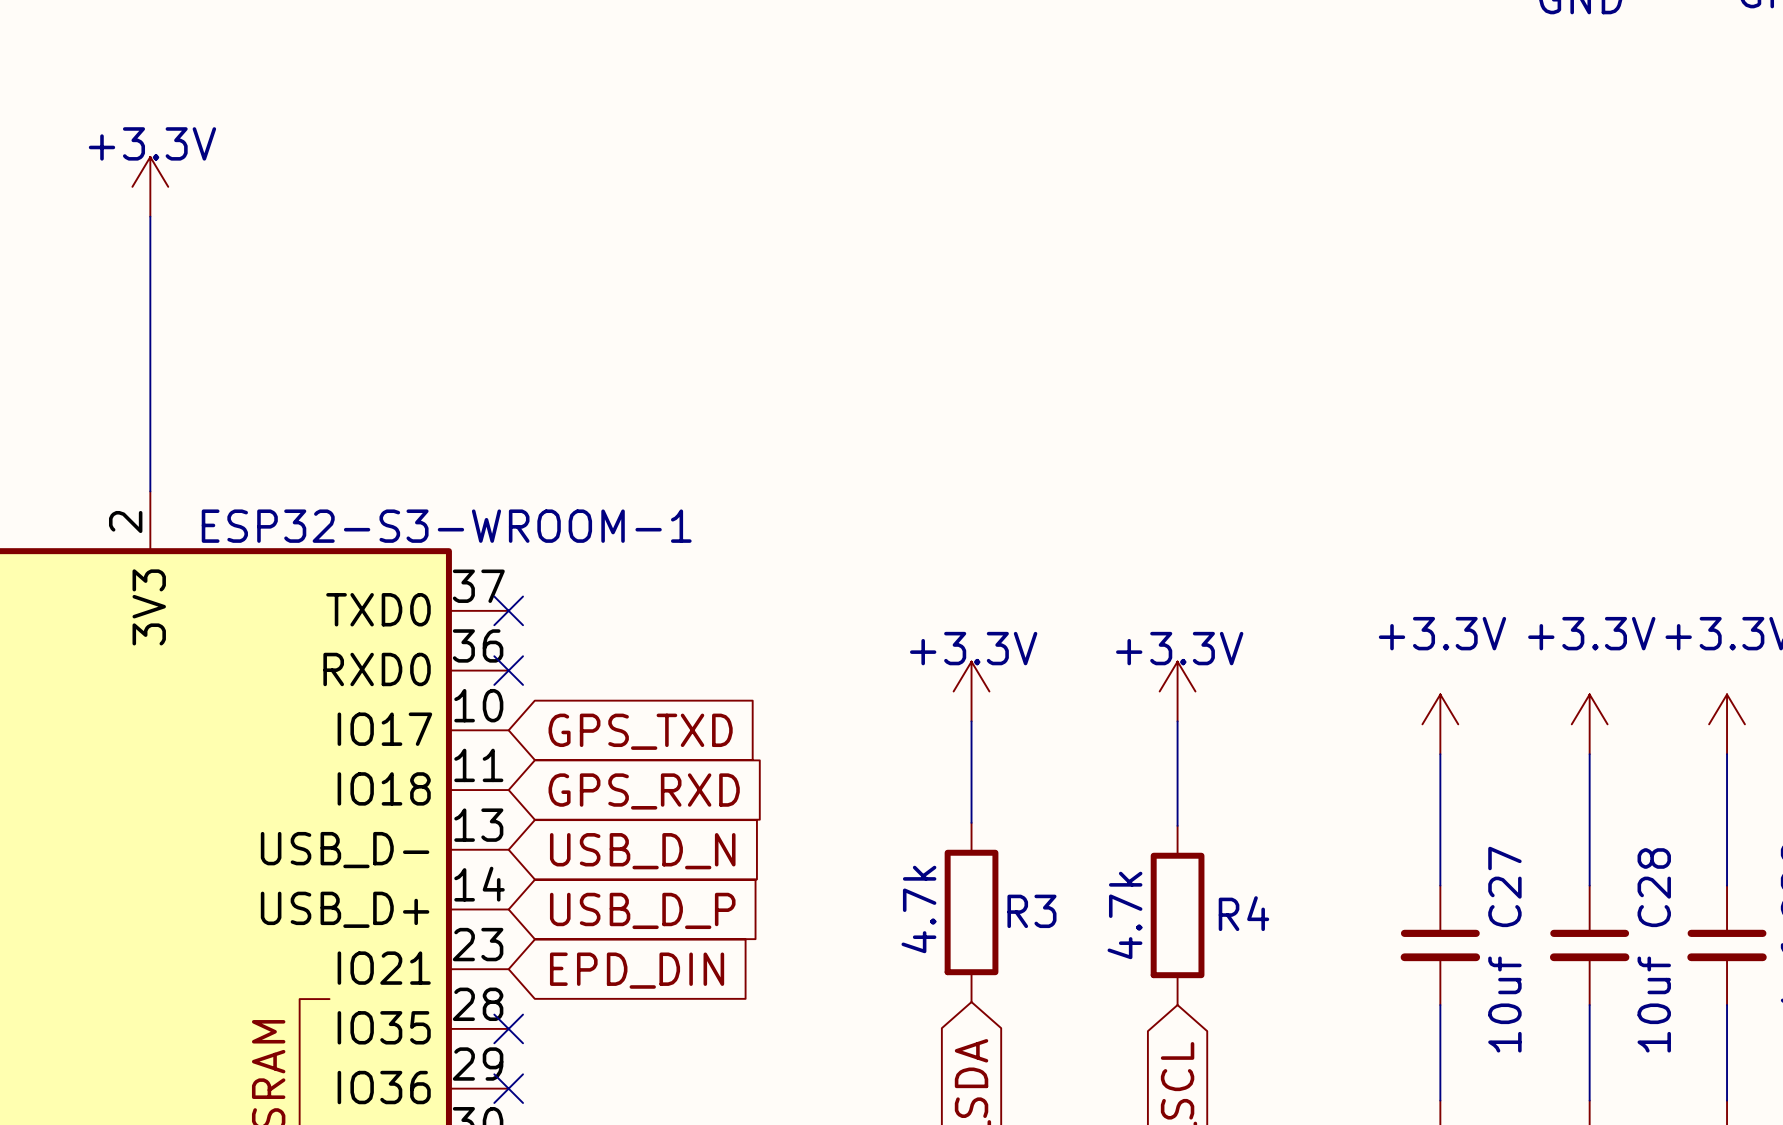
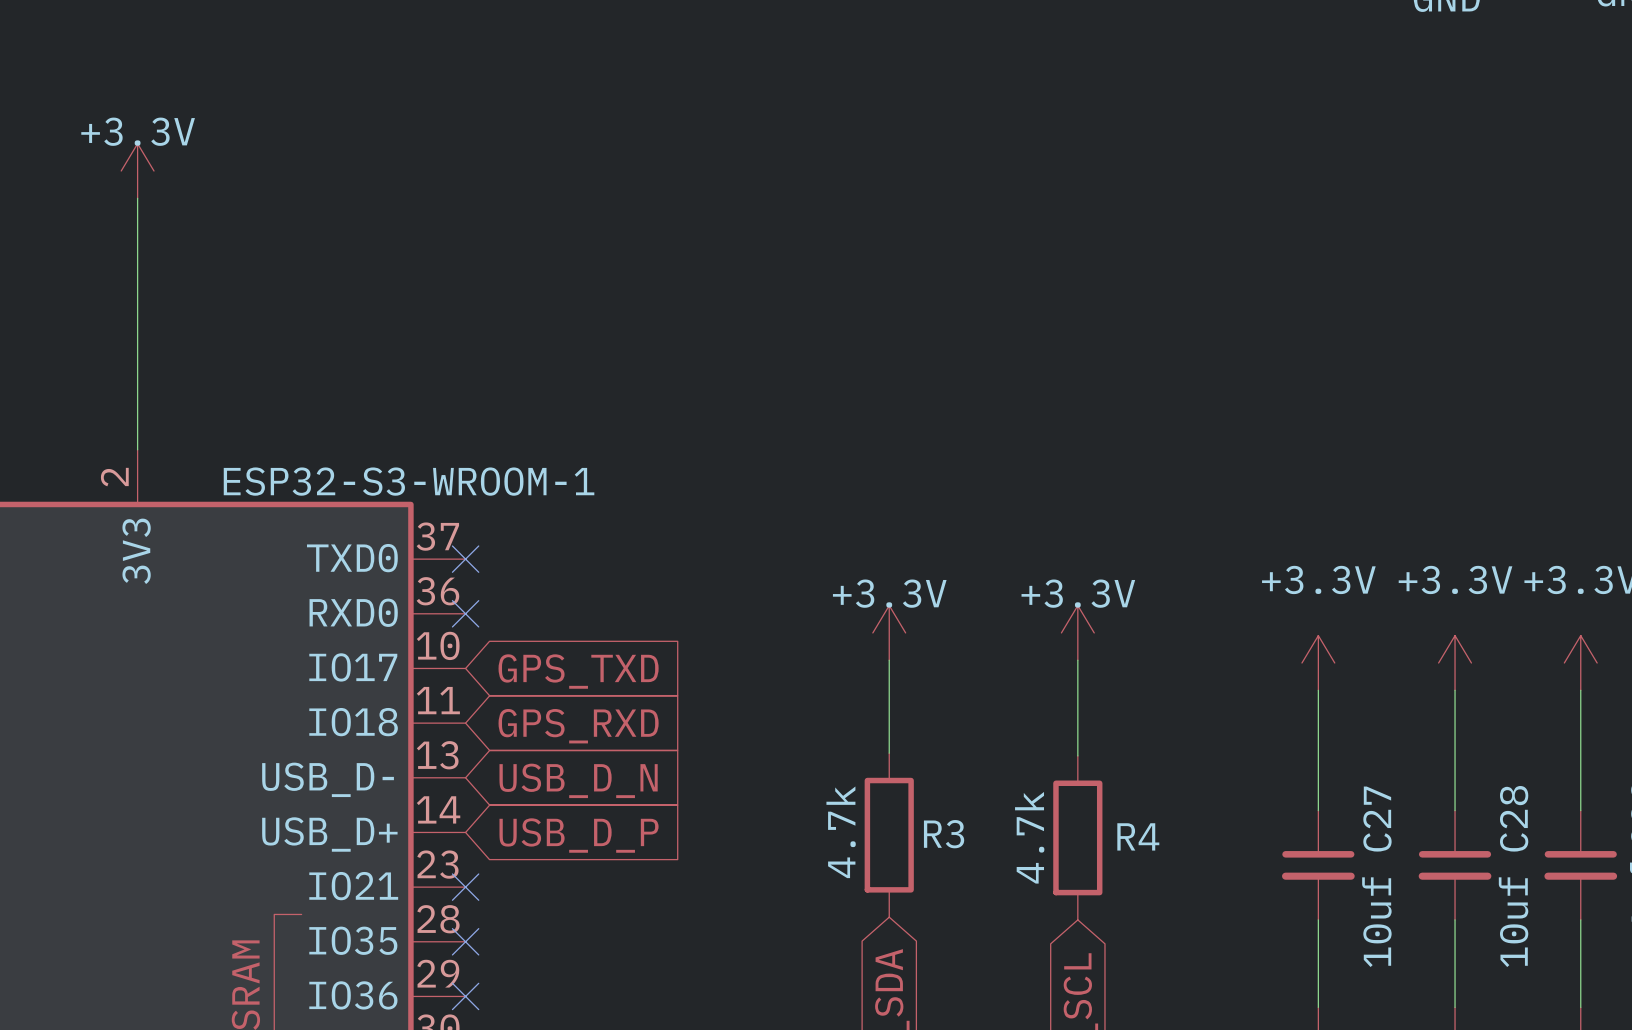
no-connect mark: none -> (465, 887)
global label: EPD_DIN (637, 970) -> none

